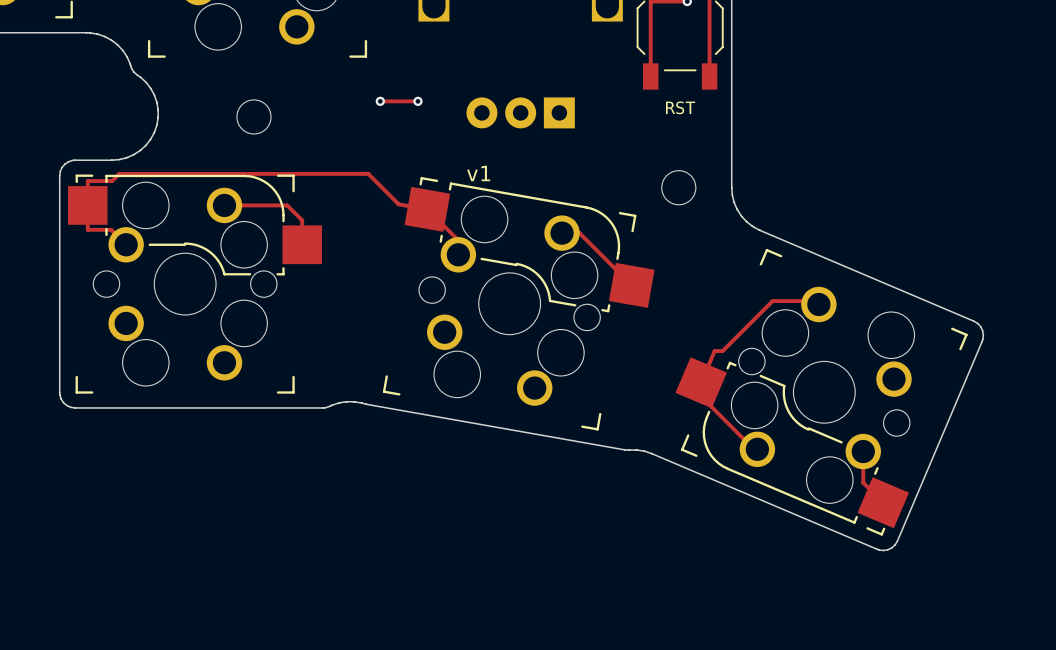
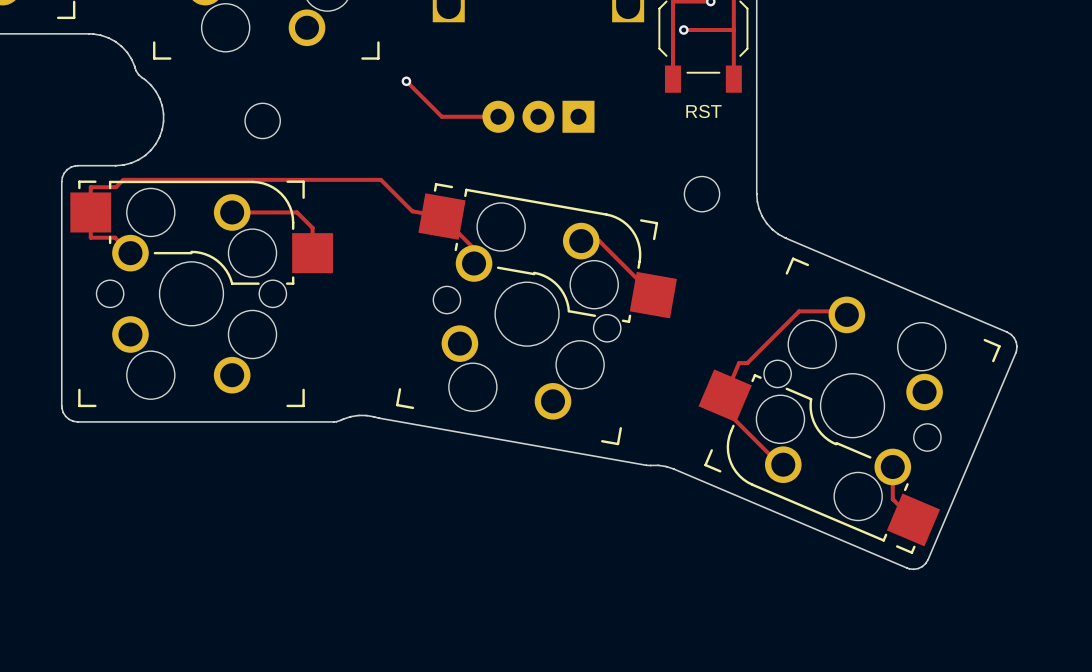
track: none -> (683, 30) (733, 30)
via: none -> (683, 30)
track: none -> (406, 81) (441, 116) (498, 116)
via: none -> (406, 81)
track: (380, 101) (417, 101) -> none
via: (380, 101) -> none
via: (417, 101) -> none
text: v1 (478, 173) -> none

